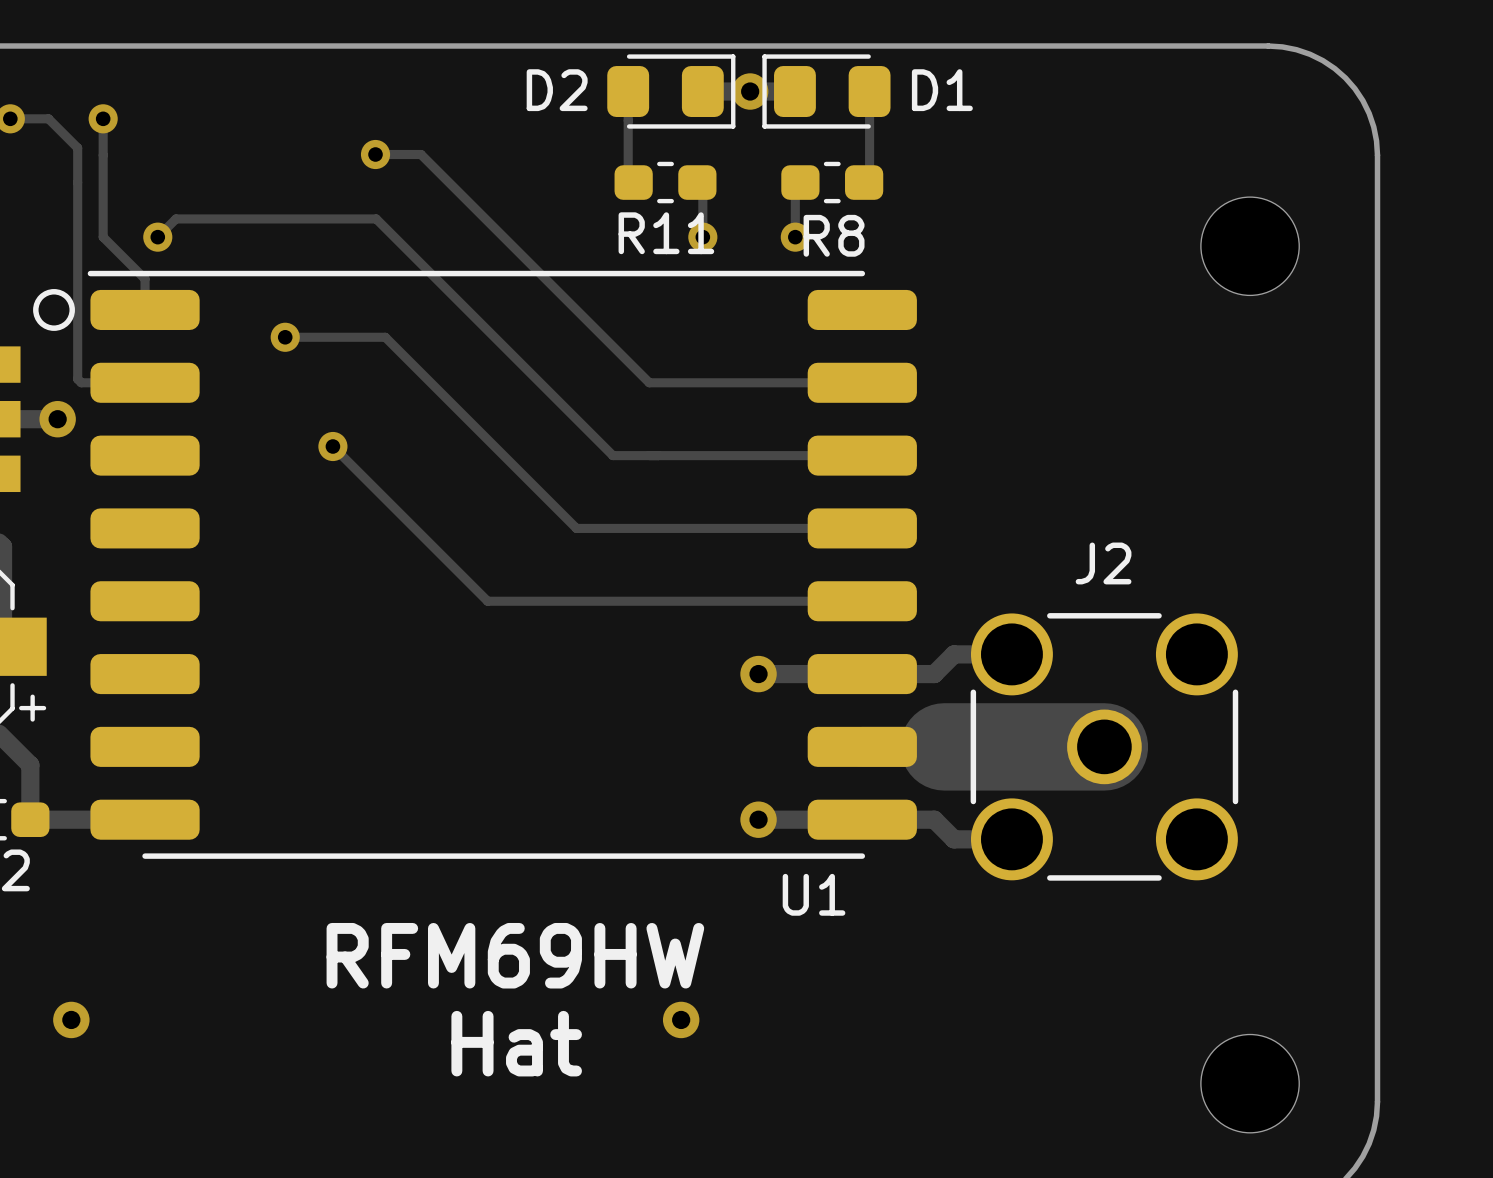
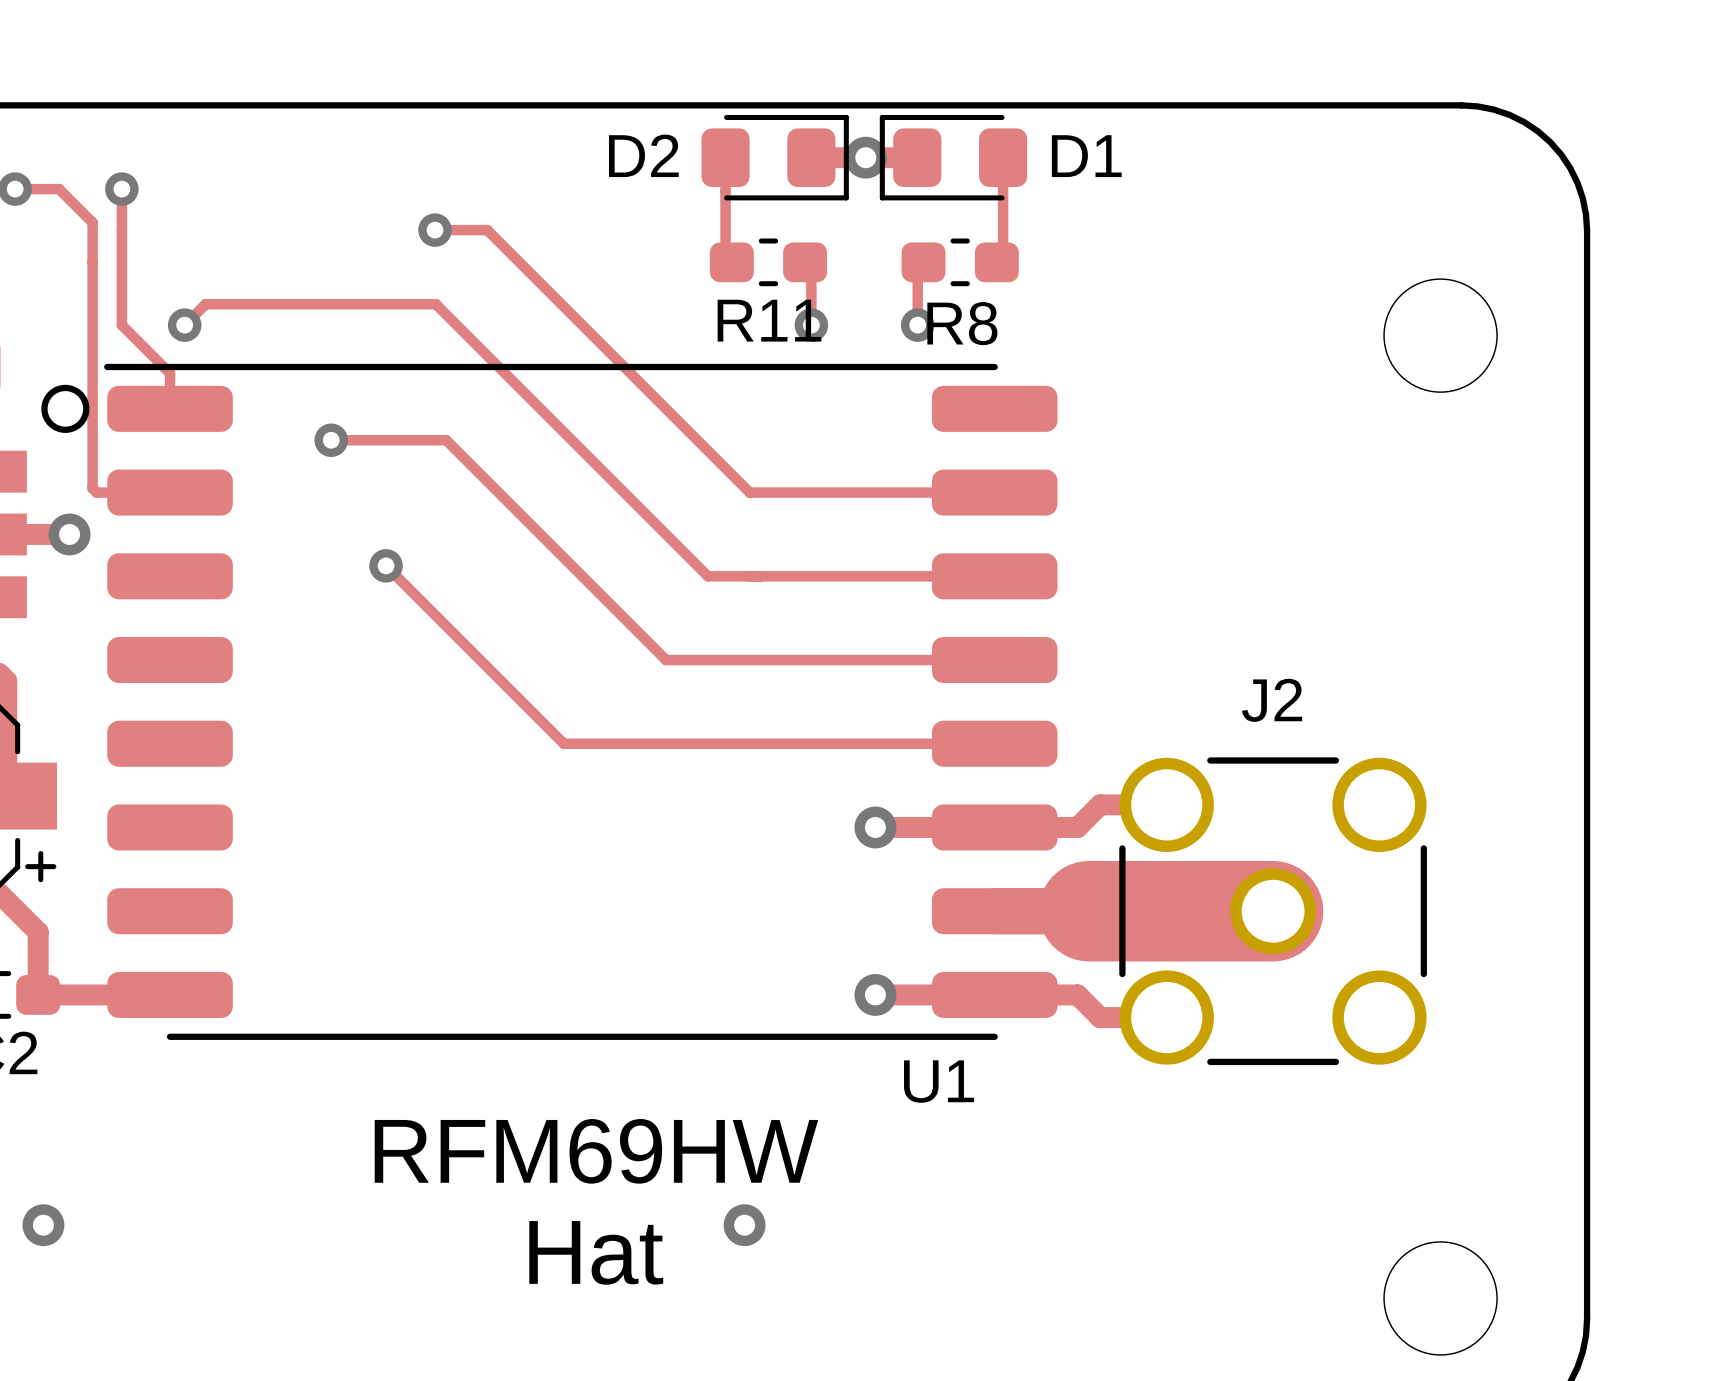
via position: (71, 1019) -> (43, 1225)
via position: (681, 1019) -> (744, 1225)

